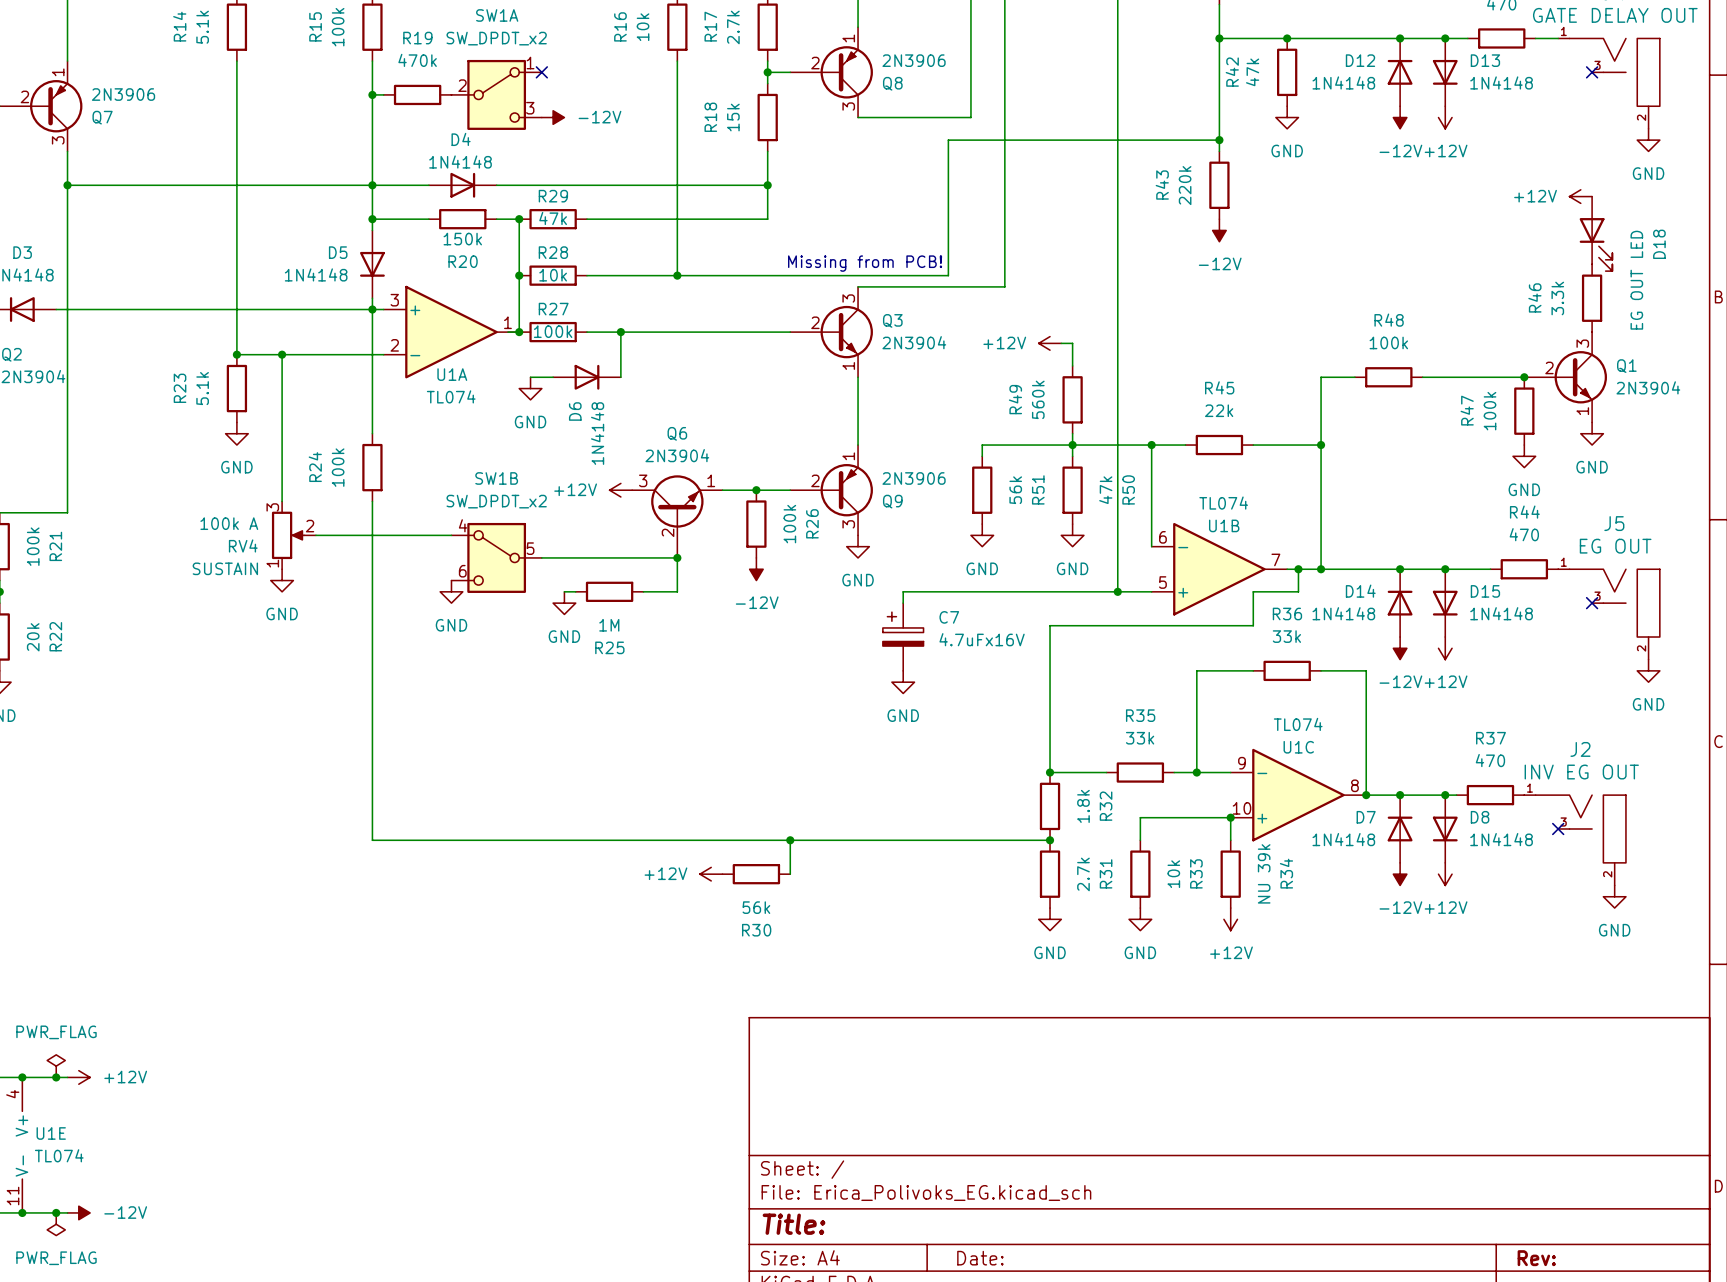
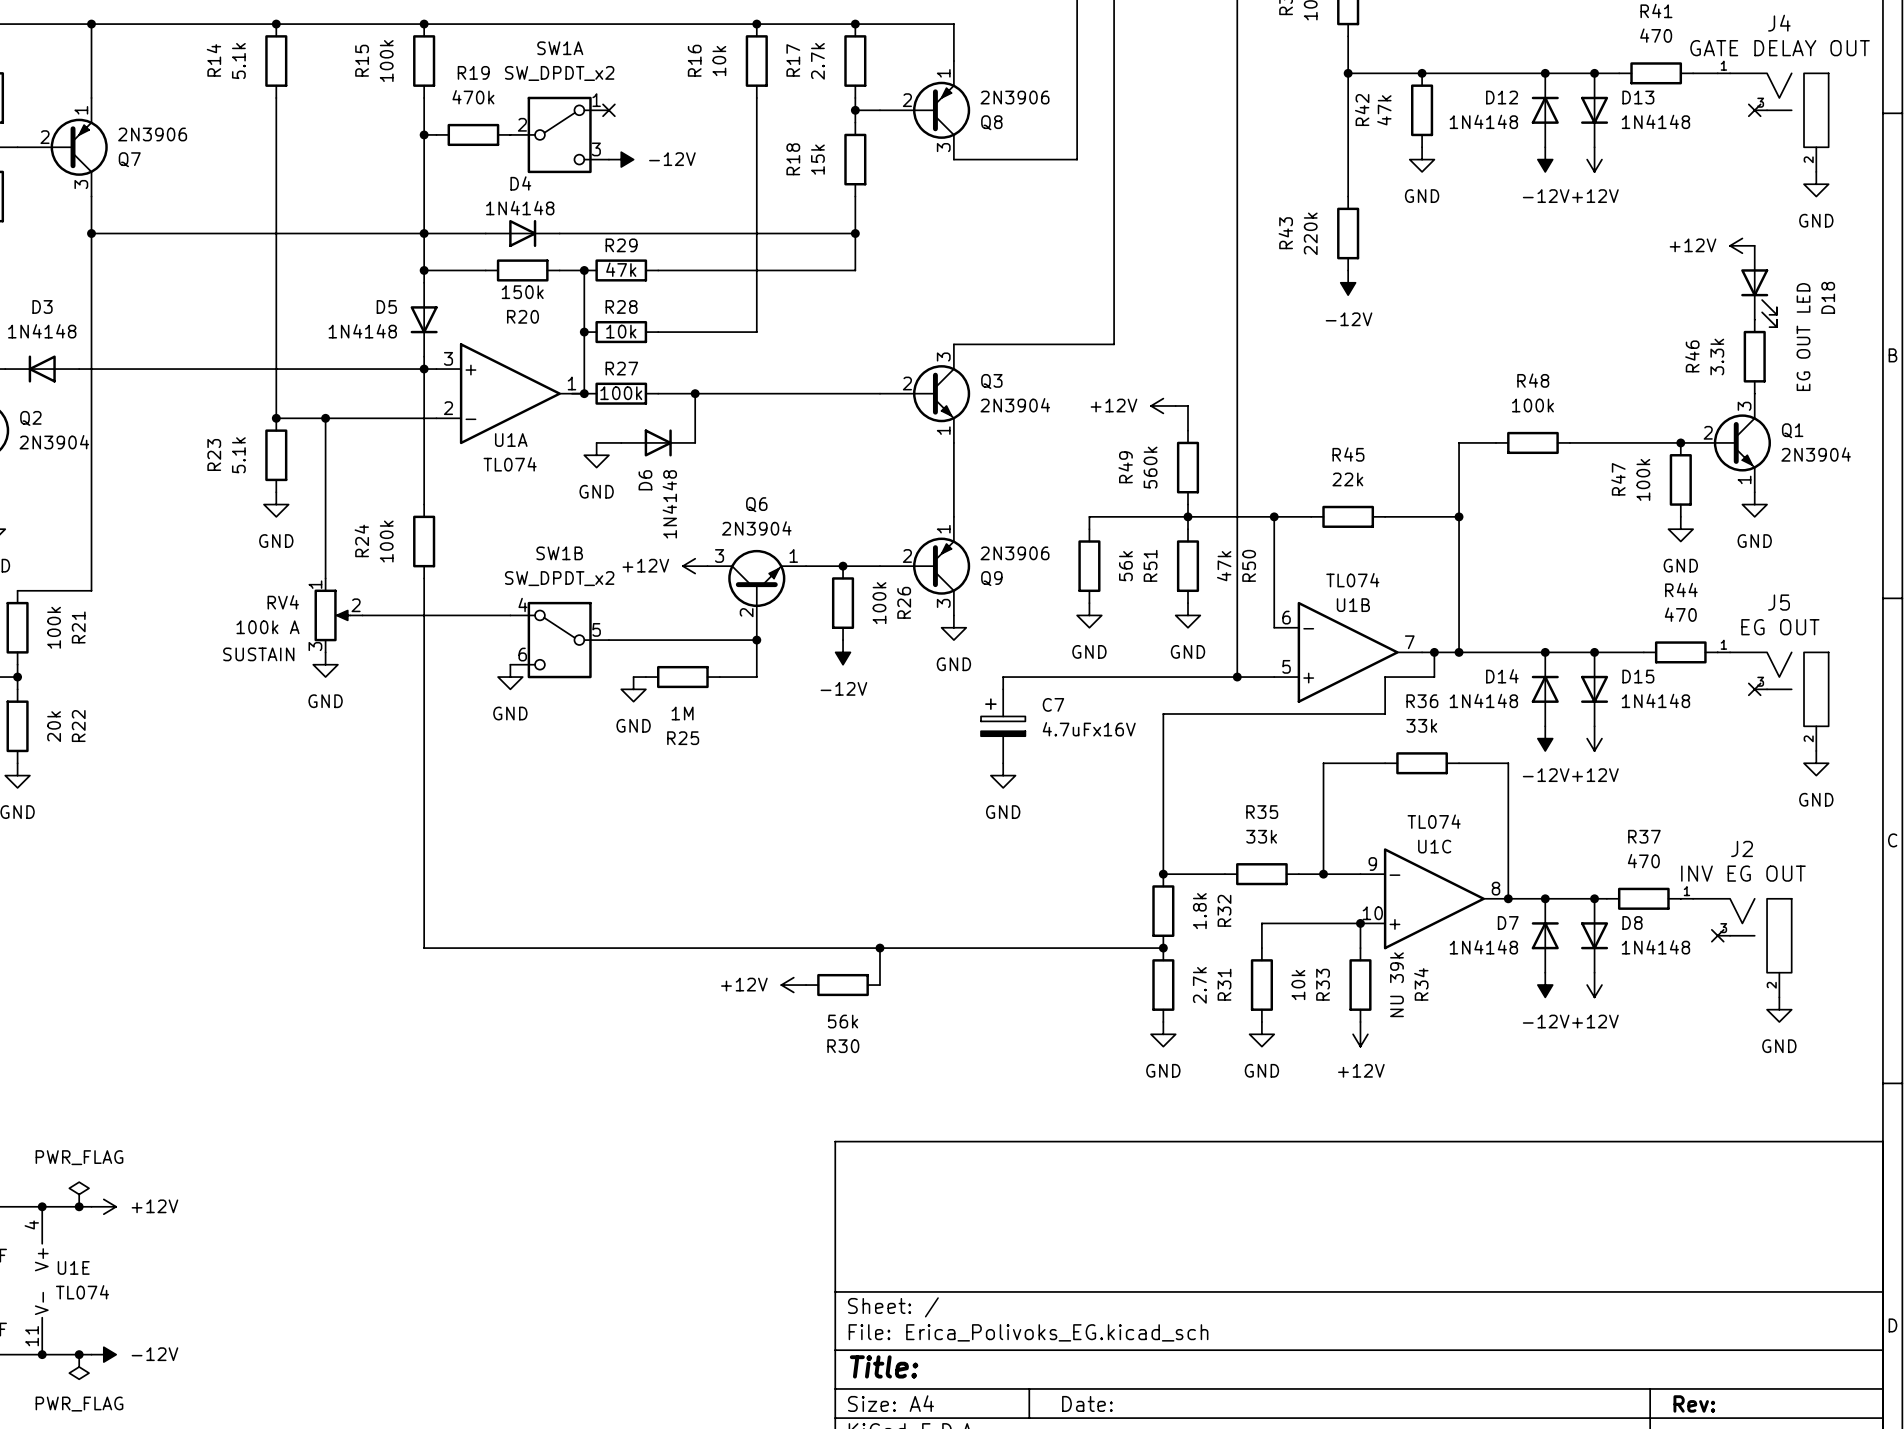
wire: (1219, 140) (948, 140) (948, 275) (677, 275) -> none
junction: (1219, 140) -> none
text: Missing from PCB! (865, 263) -> none
junction: (677, 275) -> none
RV4 flip: as is (288, 535) -> up-down (332, 615)

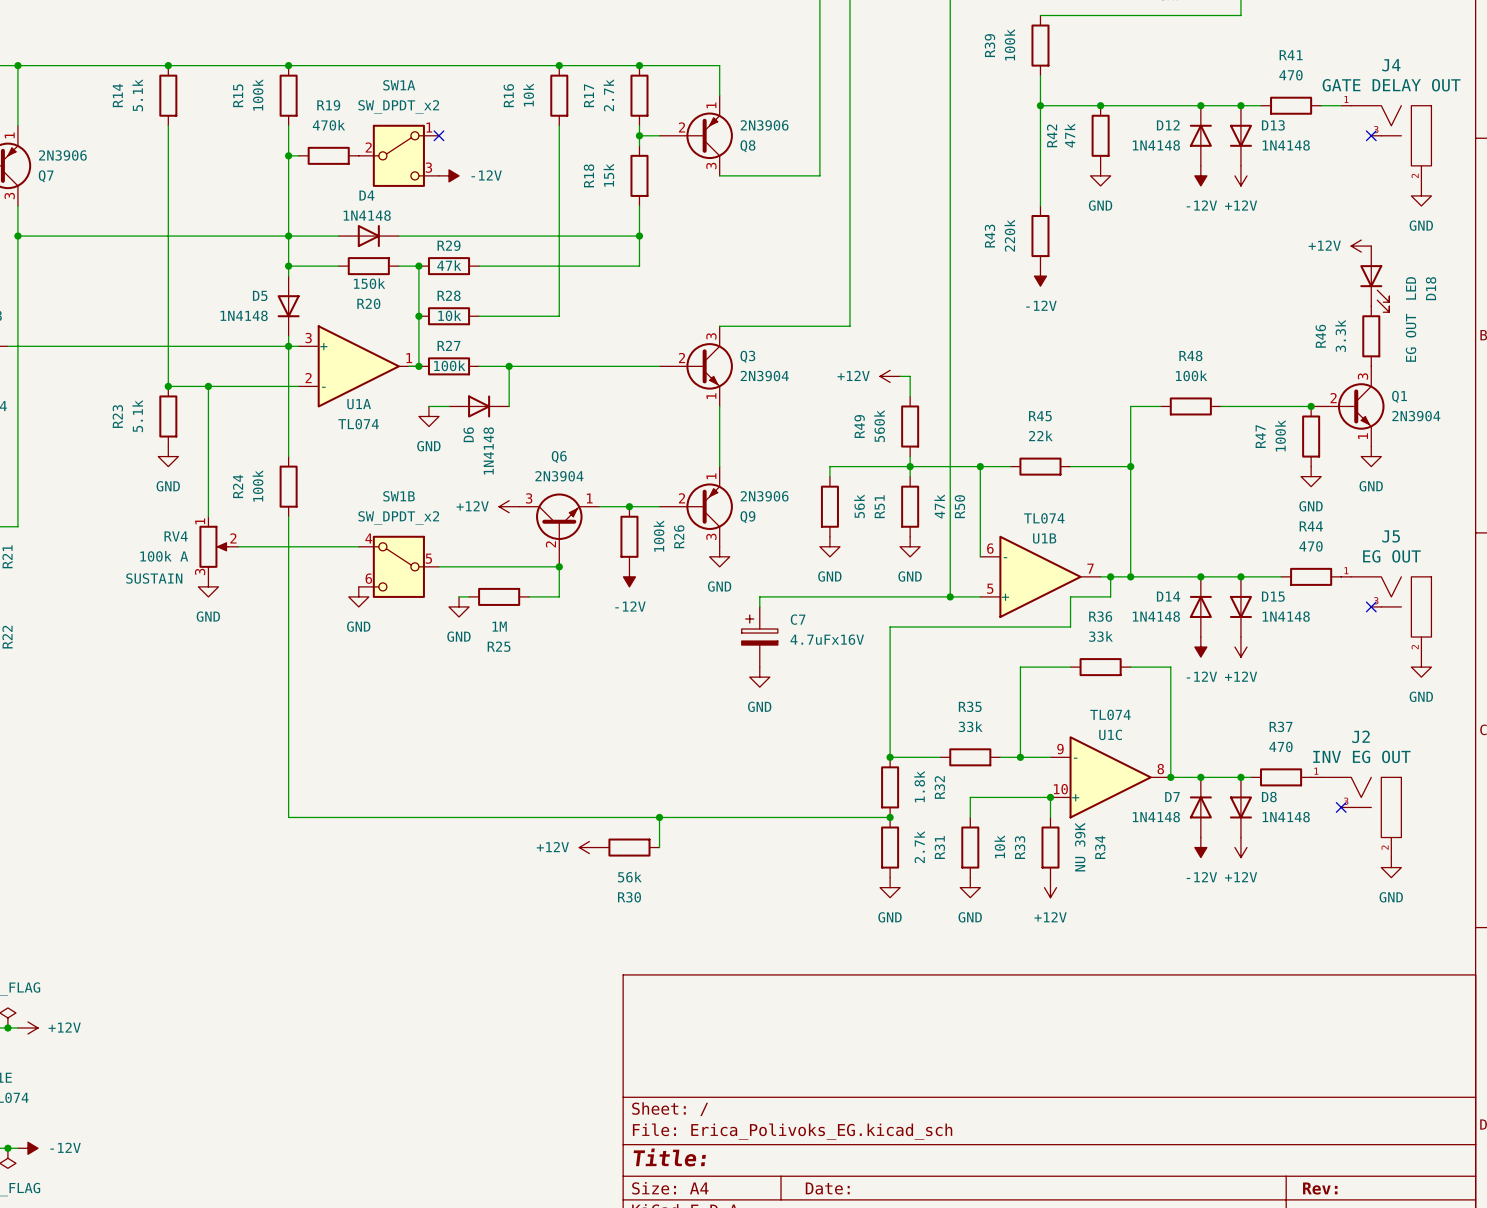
R34 value: NU 39k (1396, 984) -> NU 39K (1080, 847)

